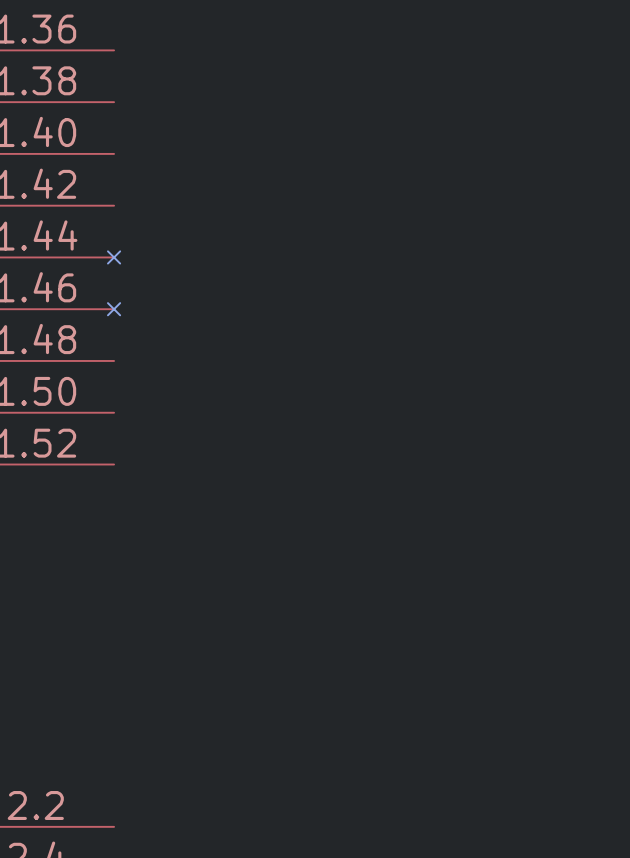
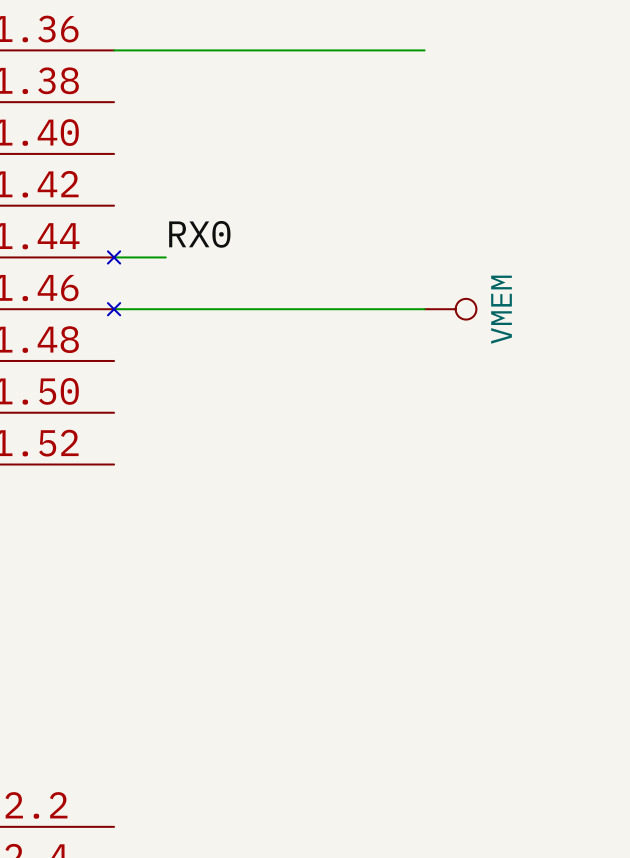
wire: none -> (114, 50) (424, 50)
label: none -> RX0 (199, 234)
wire: none -> (114, 257) (165, 257)
wire: none -> (114, 309) (424, 309)
power symbol: none -> VMEM (450, 309)

